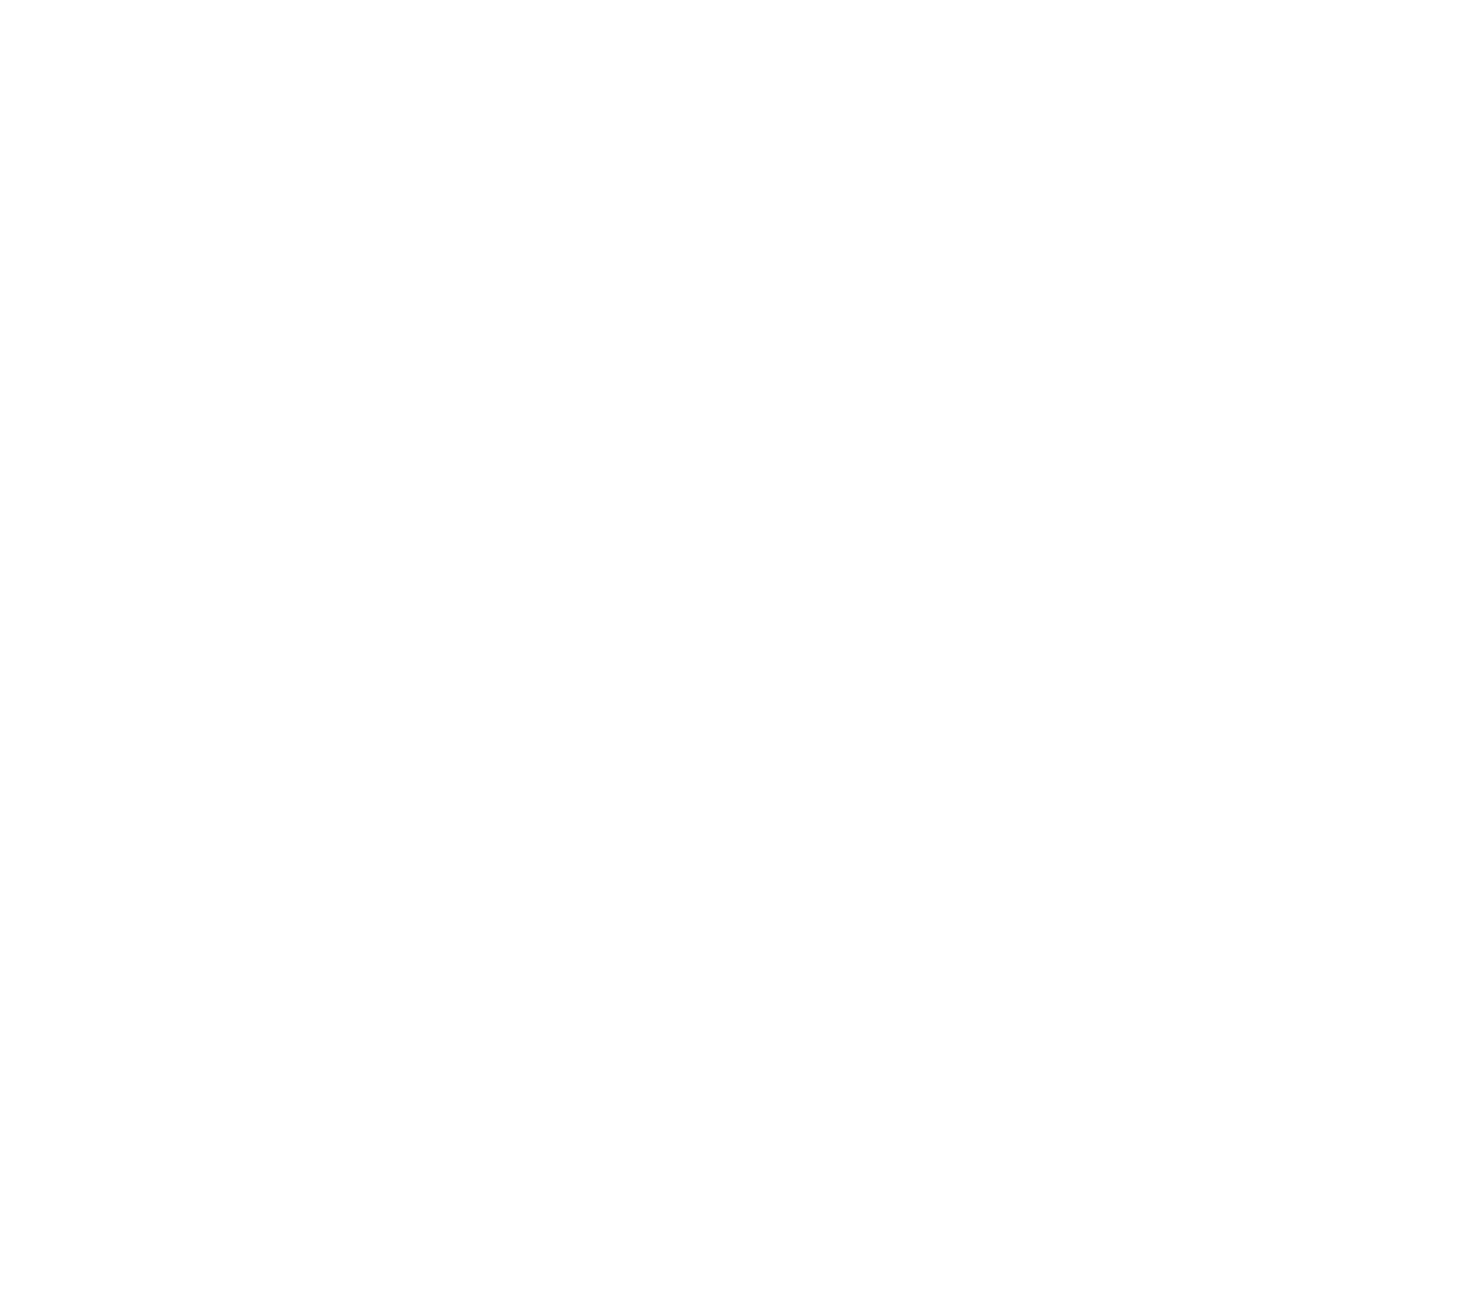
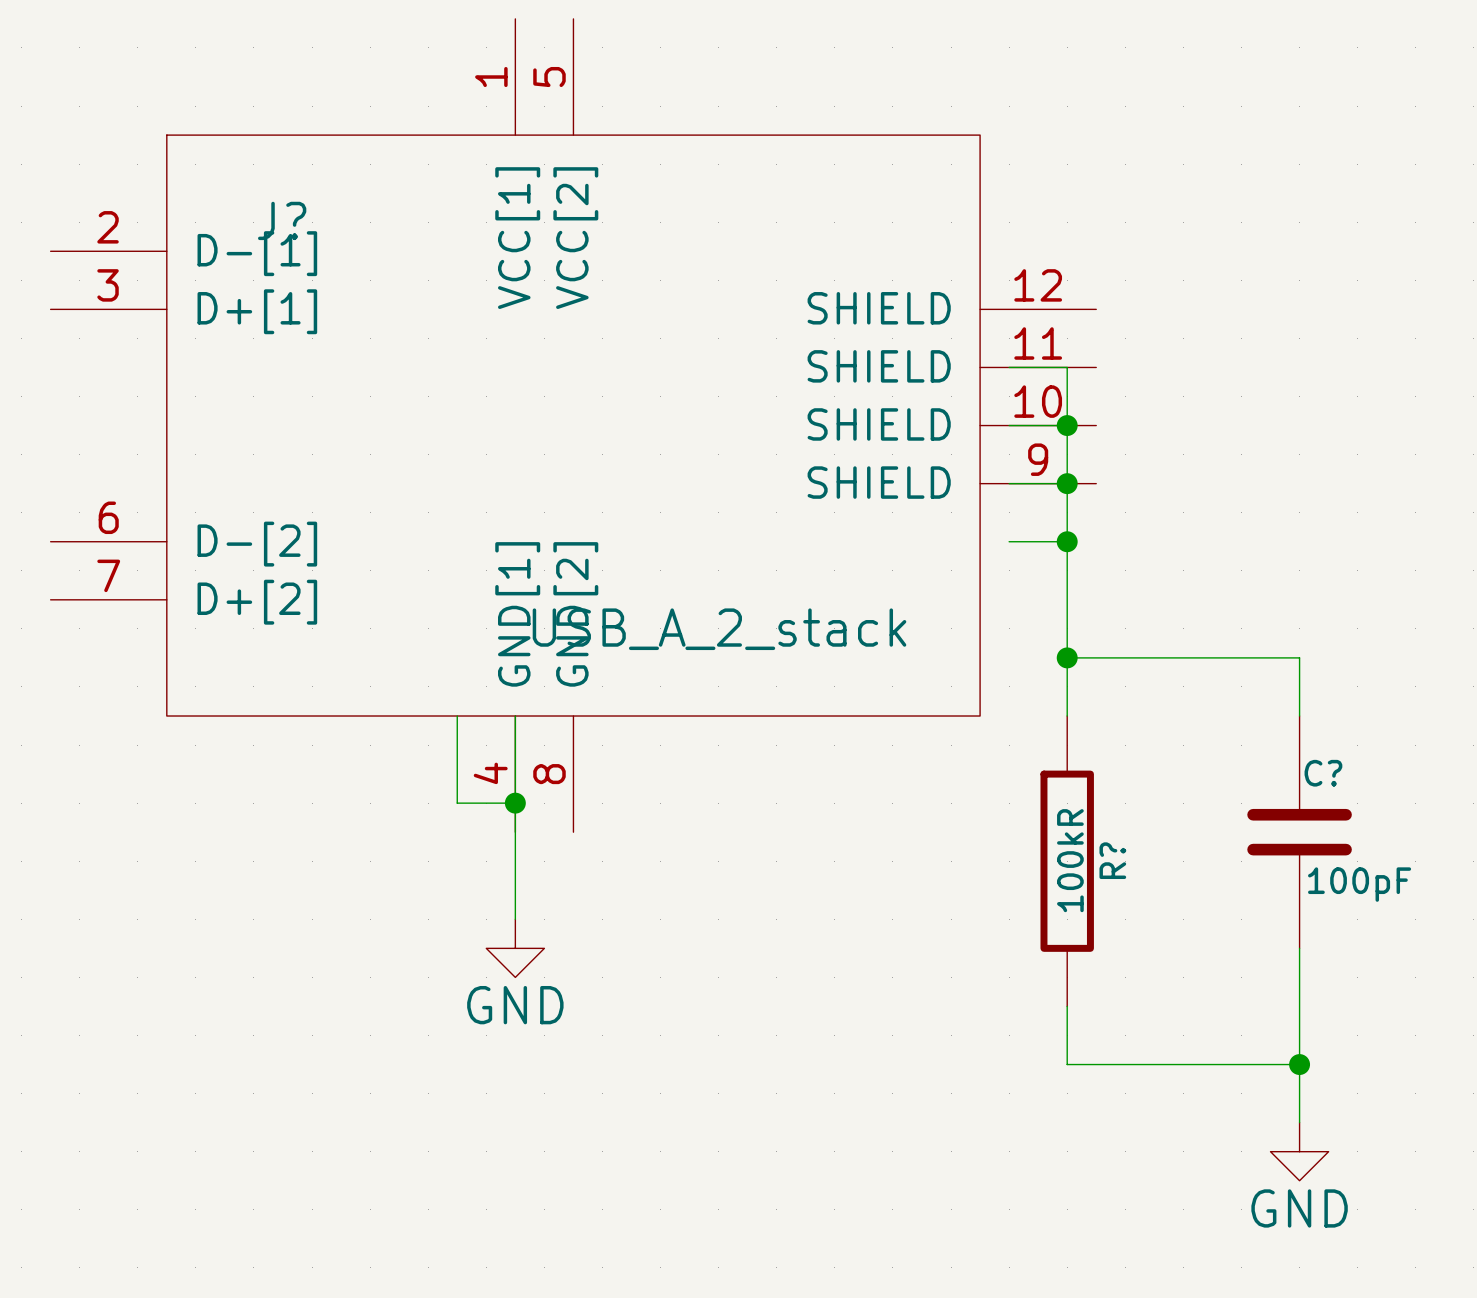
wire: none -> (1009, 367) (1067, 367) (1067, 716)
J?: none -> USB_A_2_stack (573, 425)
wire: none -> (1009, 425) (1067, 425)
junction: none -> (1067, 425)
wire: none -> (1009, 483) (1067, 483)
junction: none -> (1067, 483)
wire: none -> (1009, 541) (1067, 541)
junction: none -> (1067, 541)
wire: none -> (1067, 657) (1299, 657) (1299, 716)
junction: none -> (1067, 657)
wire: none -> (457, 716) (457, 803) (515, 803)
wire: none -> (515, 716) (515, 919)
junction: none -> (515, 803)
C?: none -> 100pF (1299, 832)
R?: none -> 100kR (1067, 861)
power symbol: none -> GND (515, 948)
wire: none -> (1299, 948) (1299, 1122)
wire: none -> (1067, 1006) (1067, 1064) (1299, 1064)
junction: none -> (1299, 1064)
power symbol: none -> GND (1299, 1151)

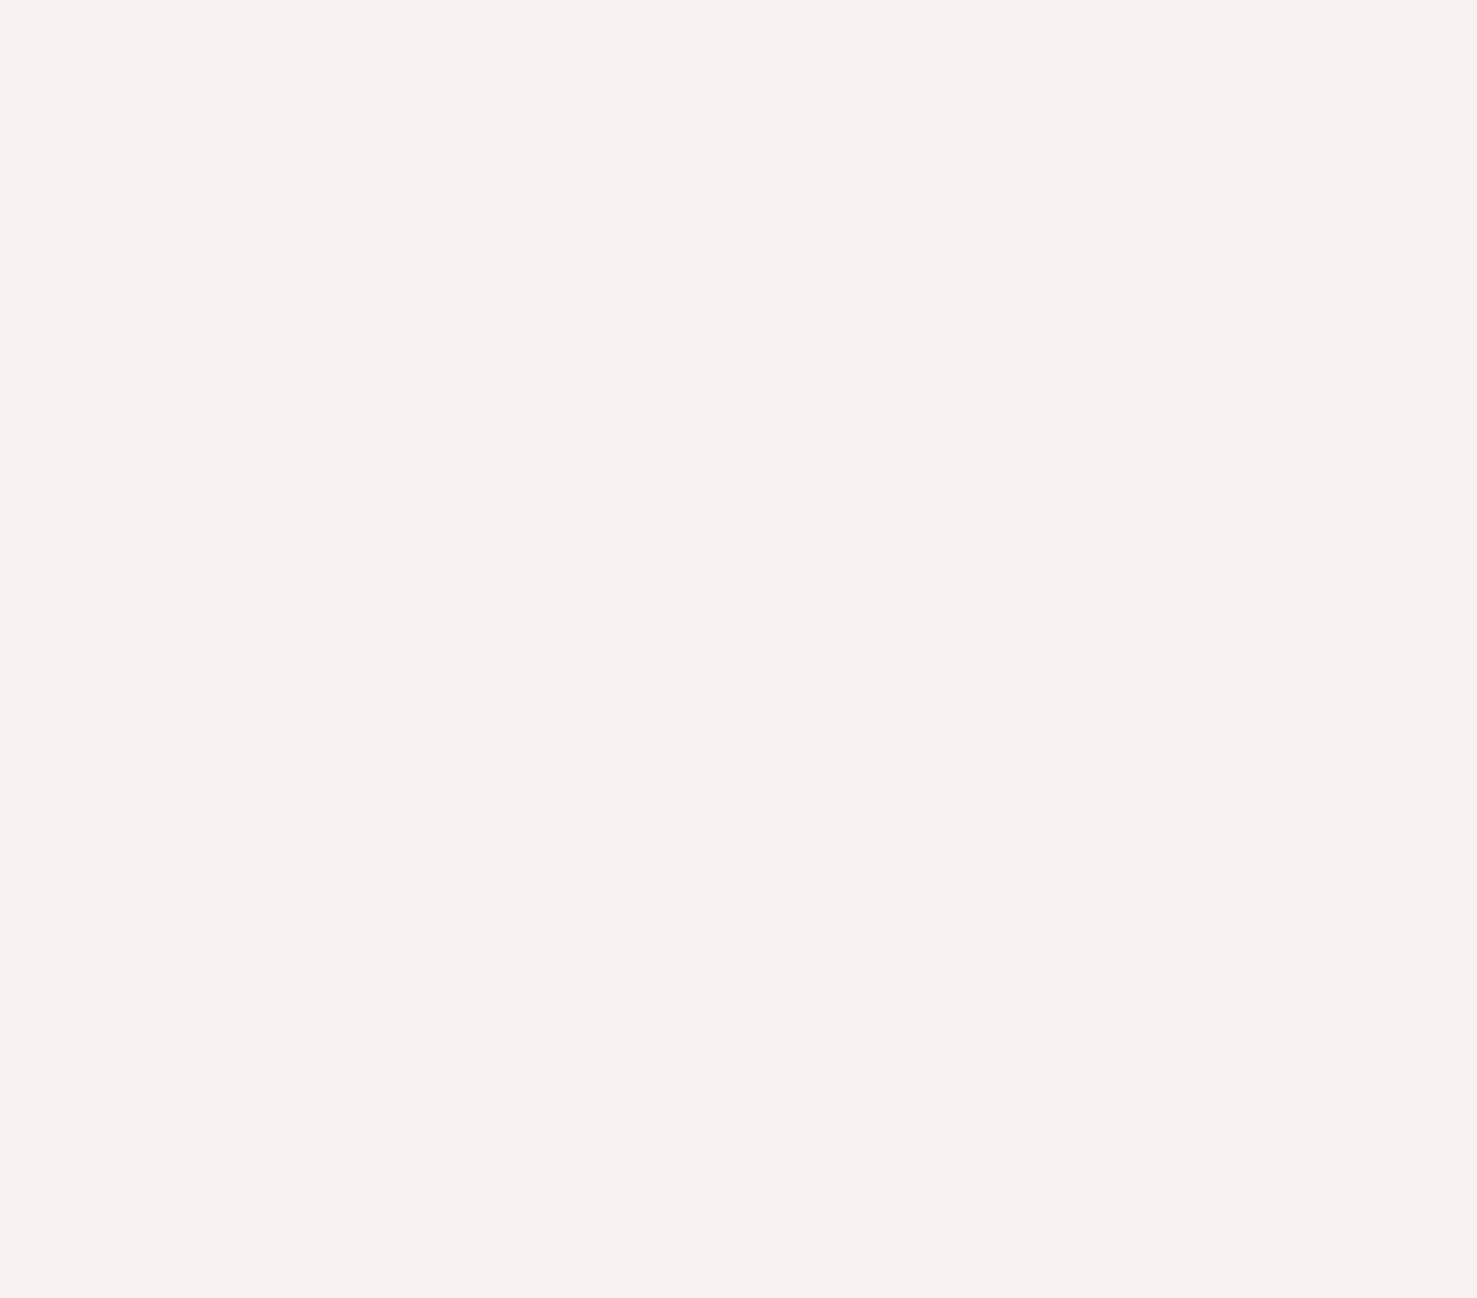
wire: (1009, 367) (1067, 367) (1067, 716) -> none
J?: USB_A_2_stack (573, 425) -> none
wire: (1009, 425) (1067, 425) -> none
junction: (1067, 425) -> none
wire: (1009, 483) (1067, 483) -> none
junction: (1067, 483) -> none
wire: (1009, 541) (1067, 541) -> none
junction: (1067, 541) -> none
wire: (1067, 657) (1299, 657) (1299, 716) -> none
junction: (1067, 657) -> none
wire: (457, 716) (457, 803) (515, 803) -> none
wire: (515, 716) (515, 919) -> none
junction: (515, 803) -> none
C?: 100pF (1299, 832) -> none
R?: 100kR (1067, 861) -> none
power symbol: GND (515, 948) -> none
wire: (1299, 948) (1299, 1122) -> none
wire: (1067, 1006) (1067, 1064) (1299, 1064) -> none
junction: (1299, 1064) -> none
power symbol: GND (1299, 1151) -> none

